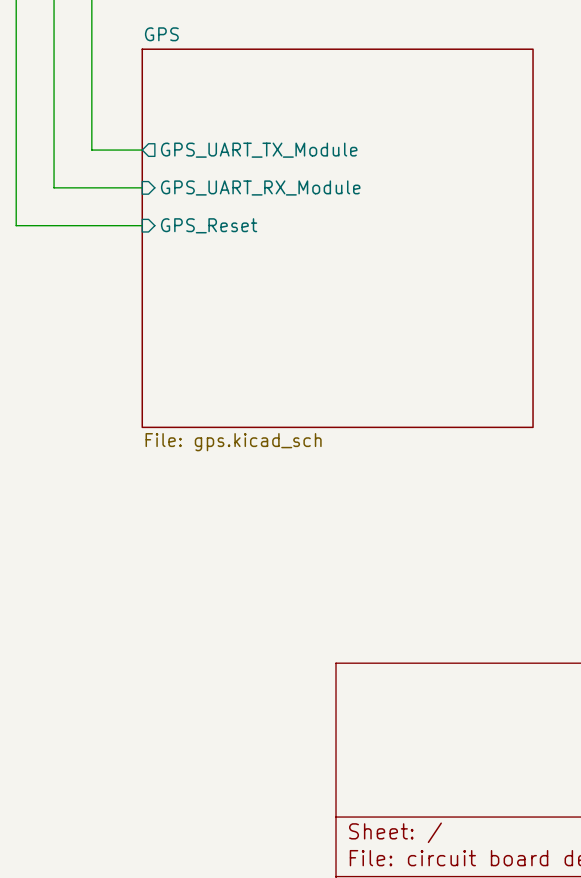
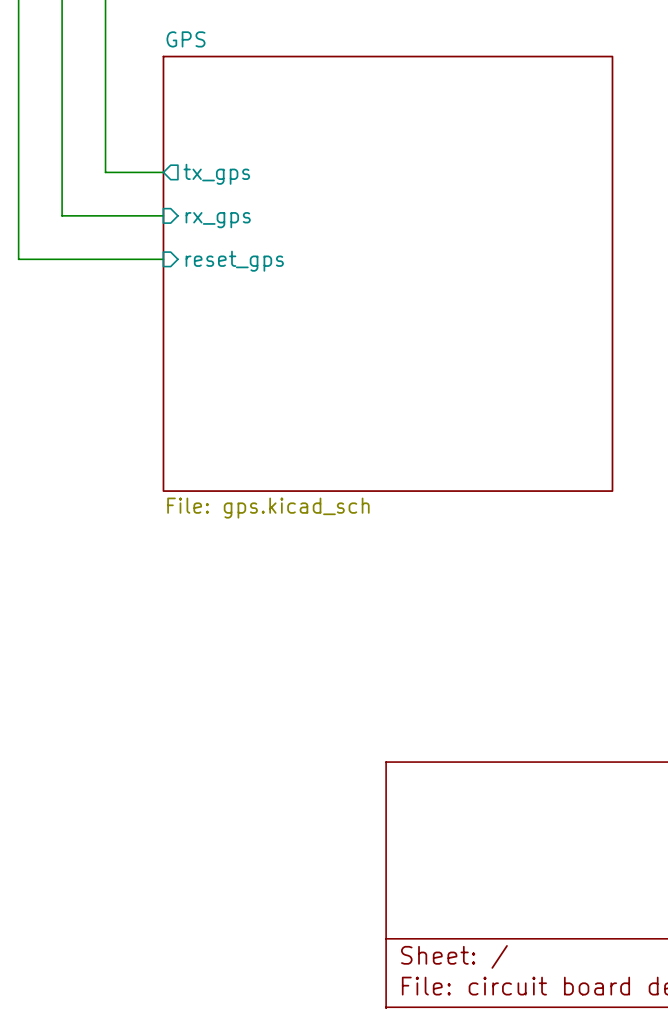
sheet pin: GPS_UART_TX_Module (259, 150) -> tx_gps (216, 174)
sheet pin: GPS_UART_RX_Module (260, 187) -> rx_gps (218, 220)
sheet pin: GPS_Reset (209, 225) -> reset_gps (234, 261)

